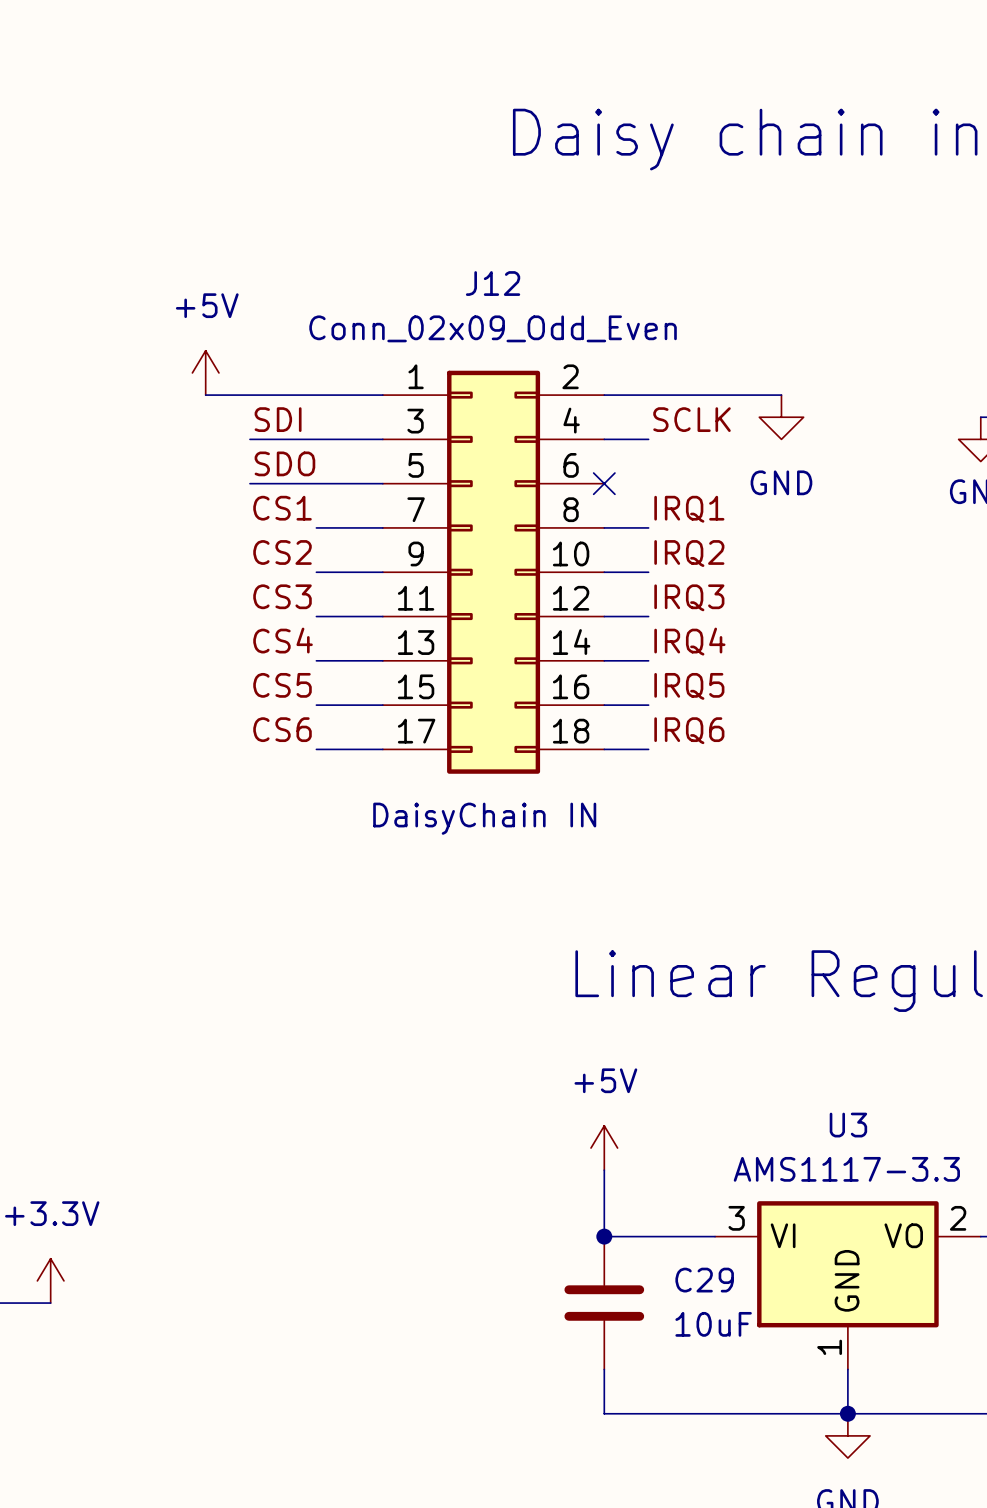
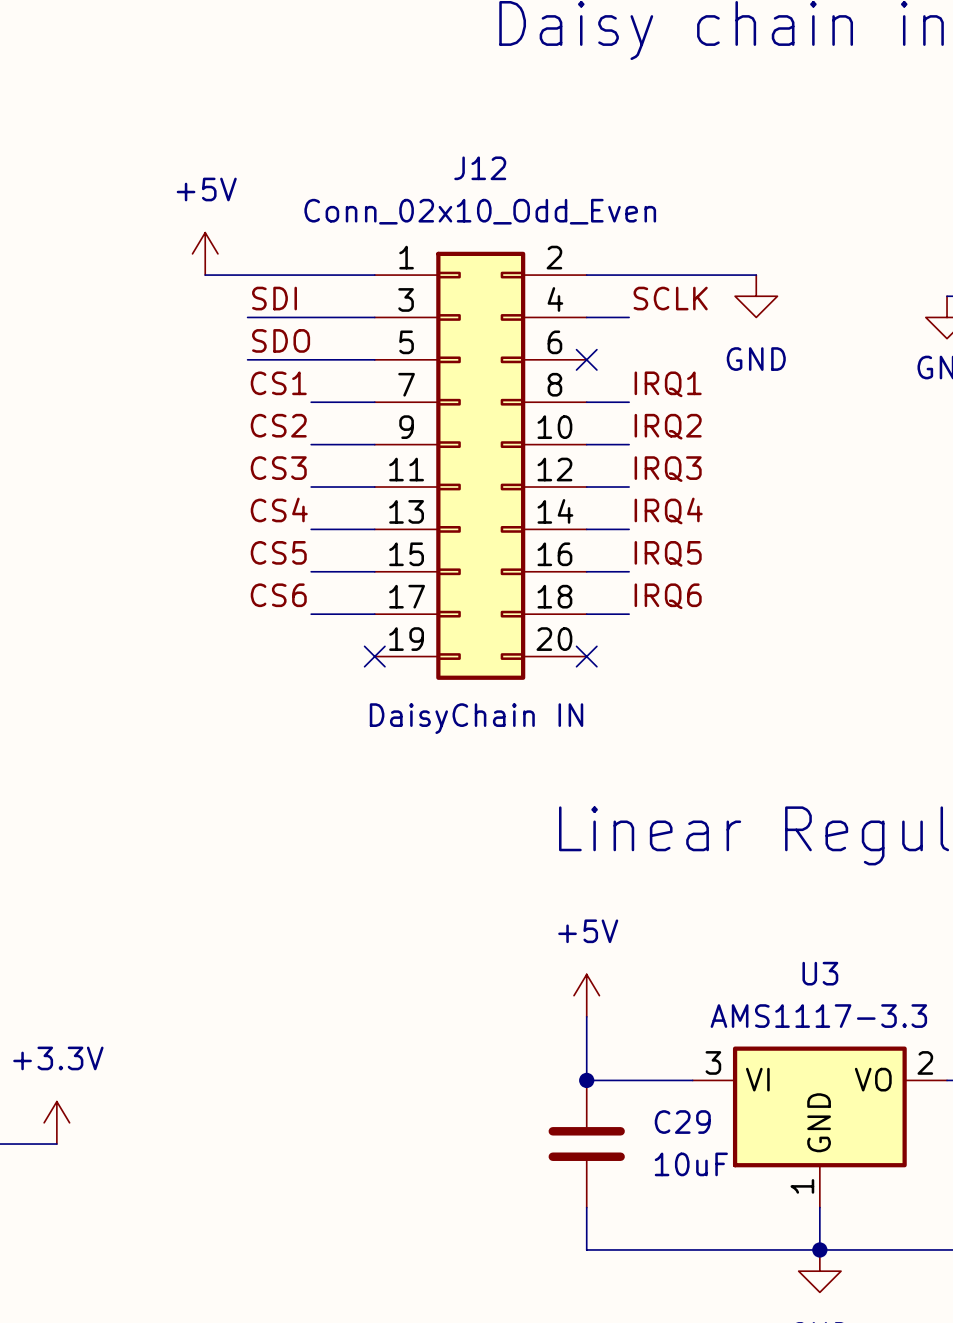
J12 value: Conn_02x09_Odd_Even (493, 328) -> Conn_02x10_Odd_Even (480, 211)
J12 symbol: [382, 370, 605, 774] -> [374, 251, 587, 680]
no-connect mark: none -> (374, 656)
no-connect mark: none -> (586, 656)

